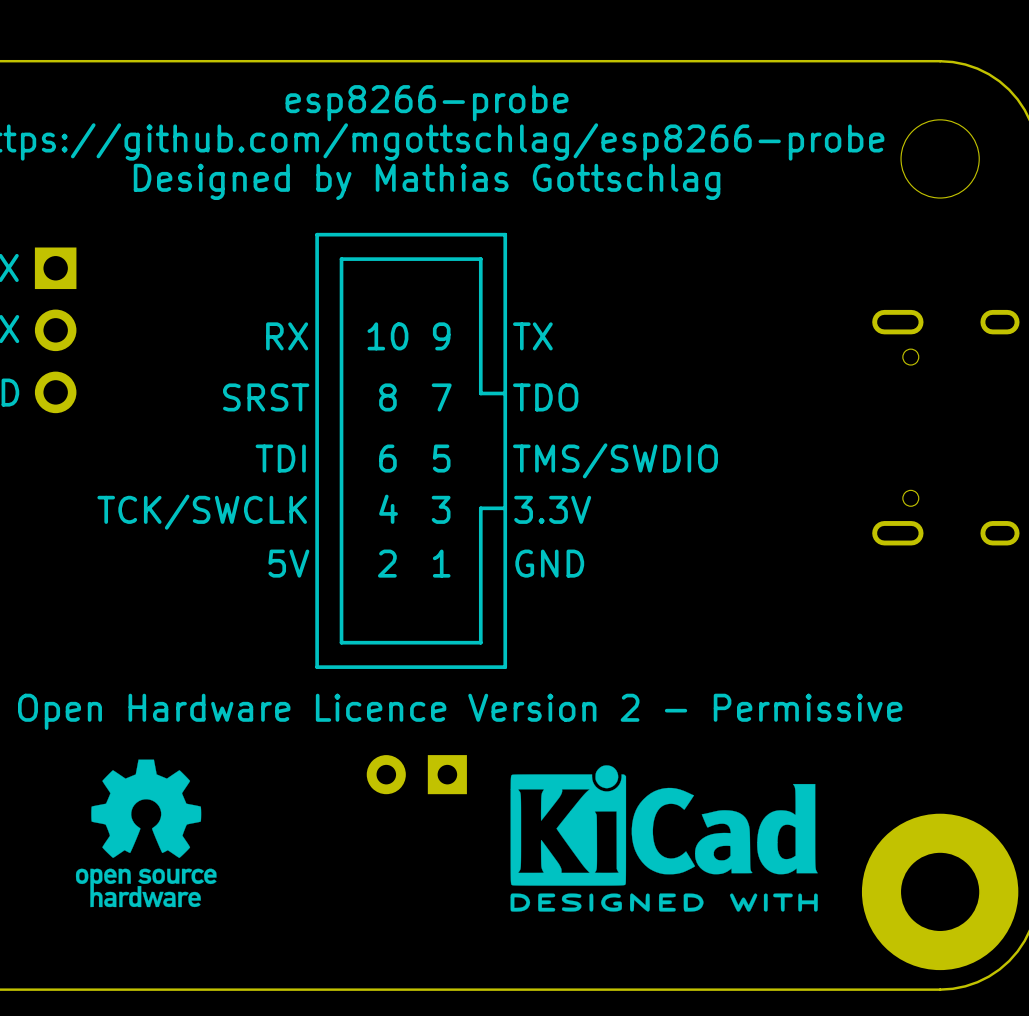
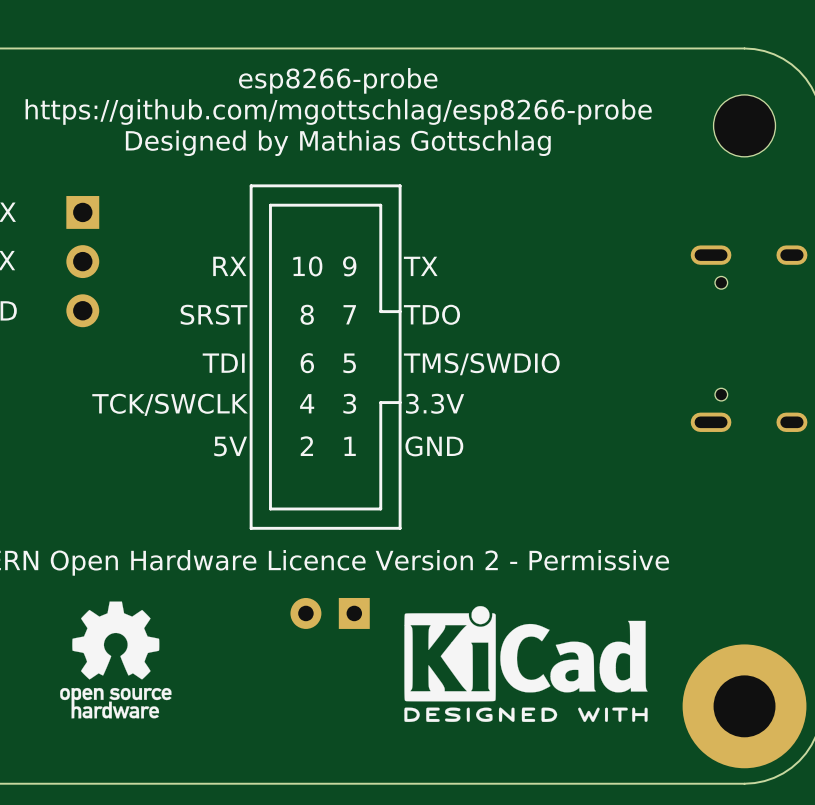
part position: (55, 330) -> (82, 261)

